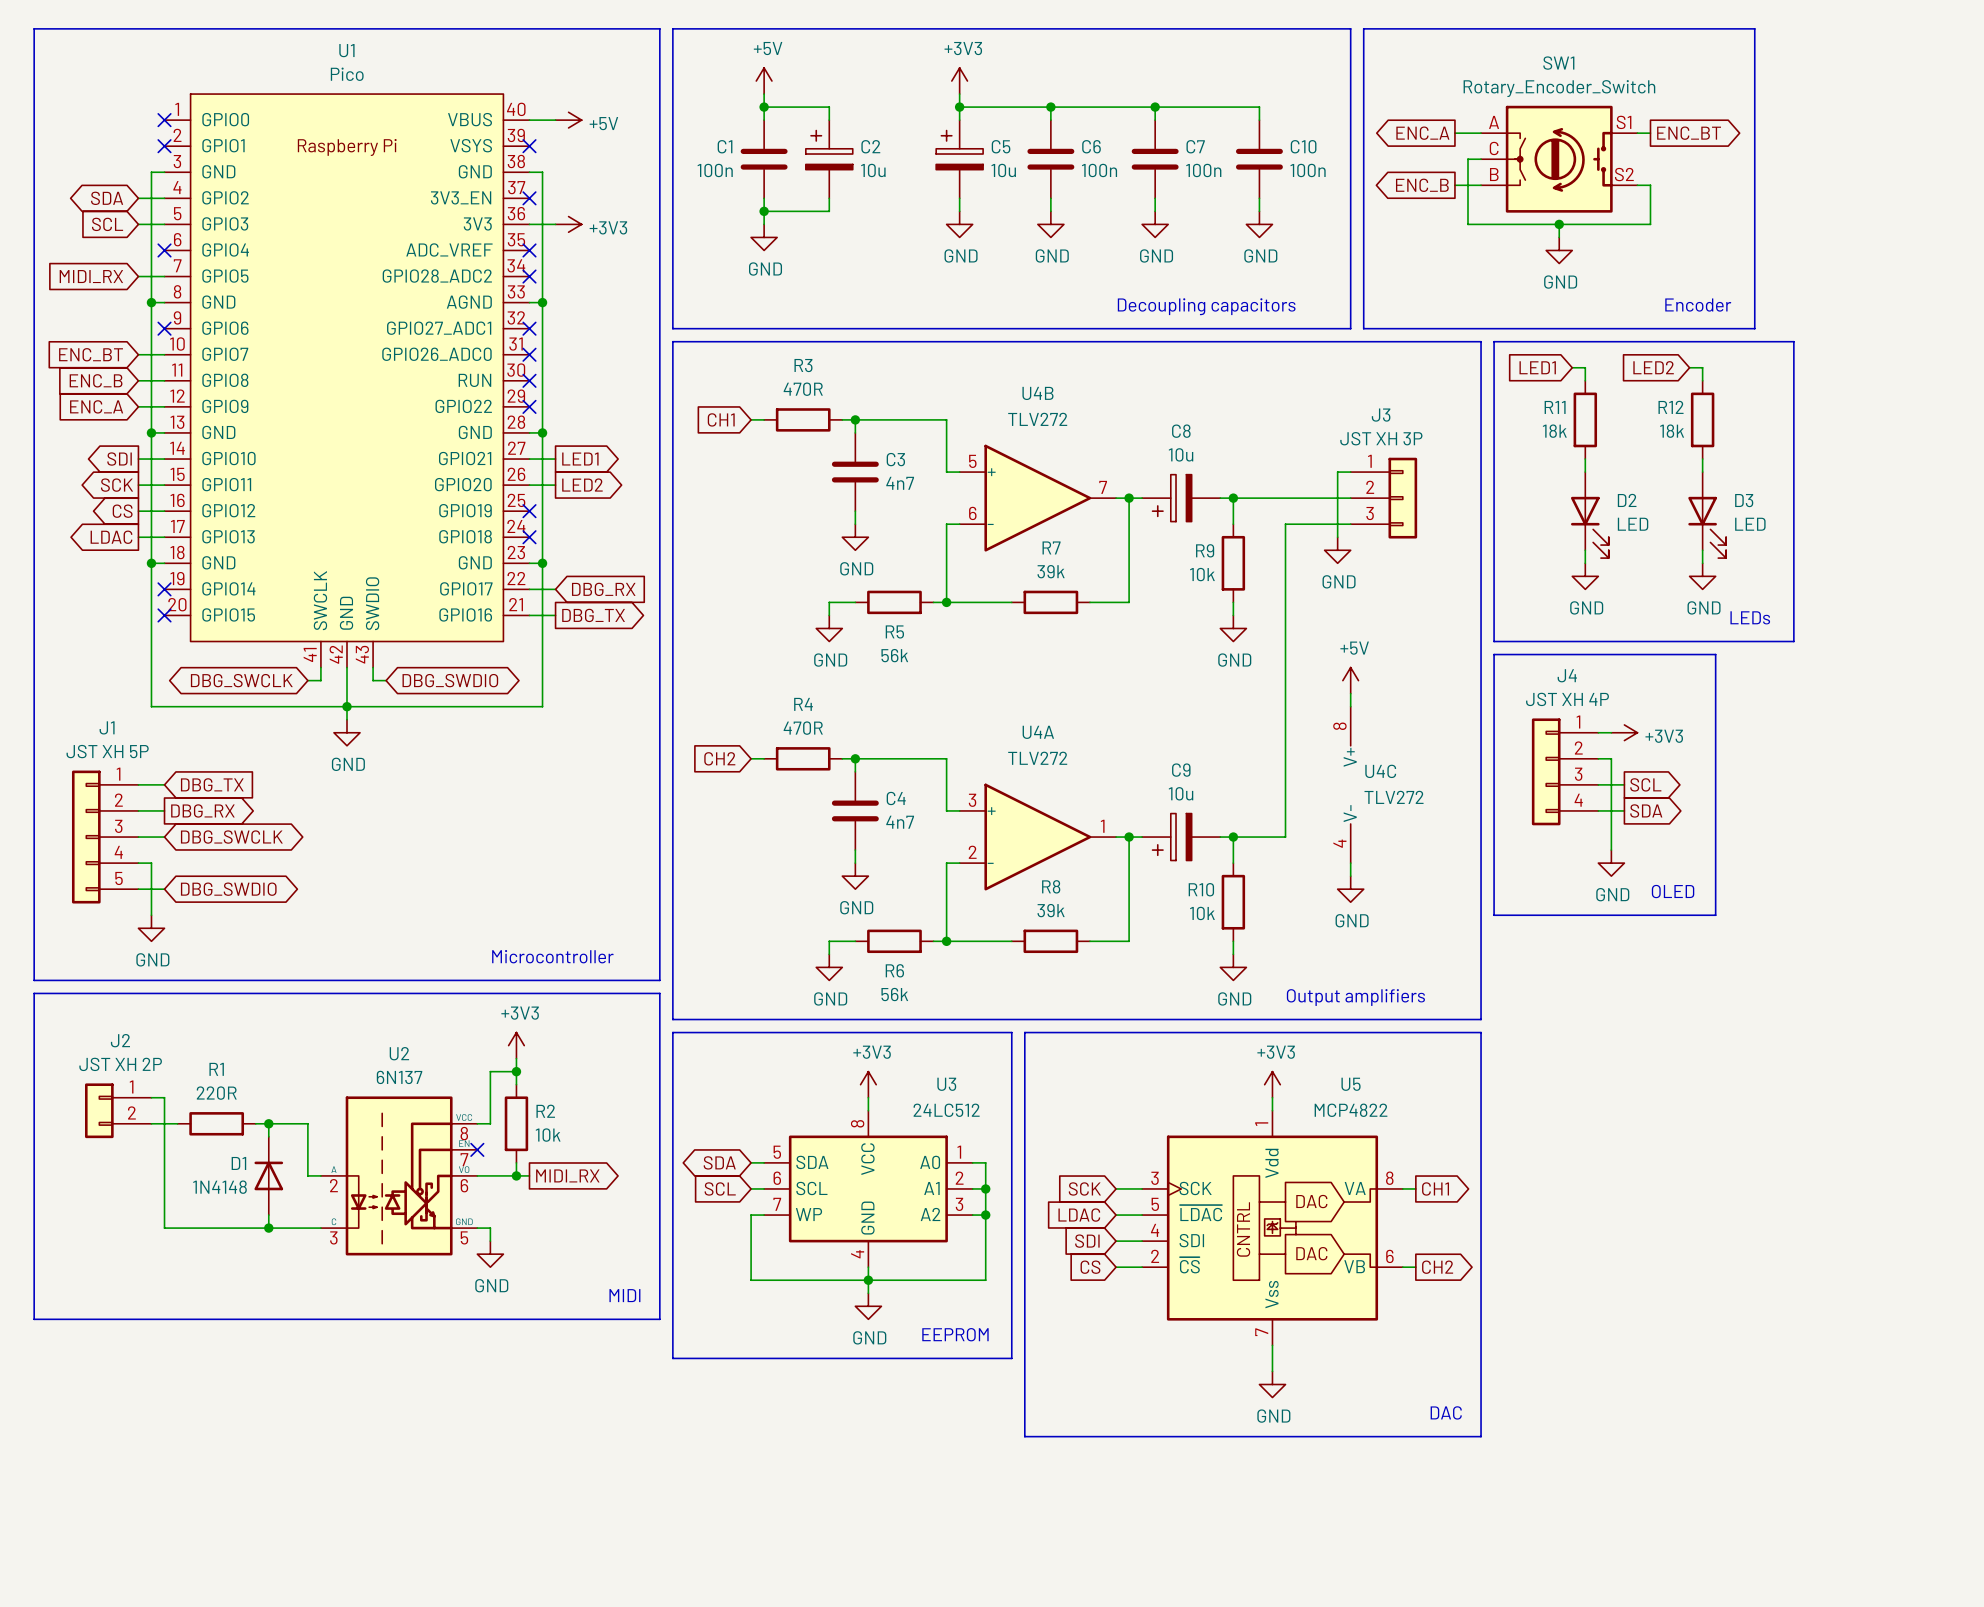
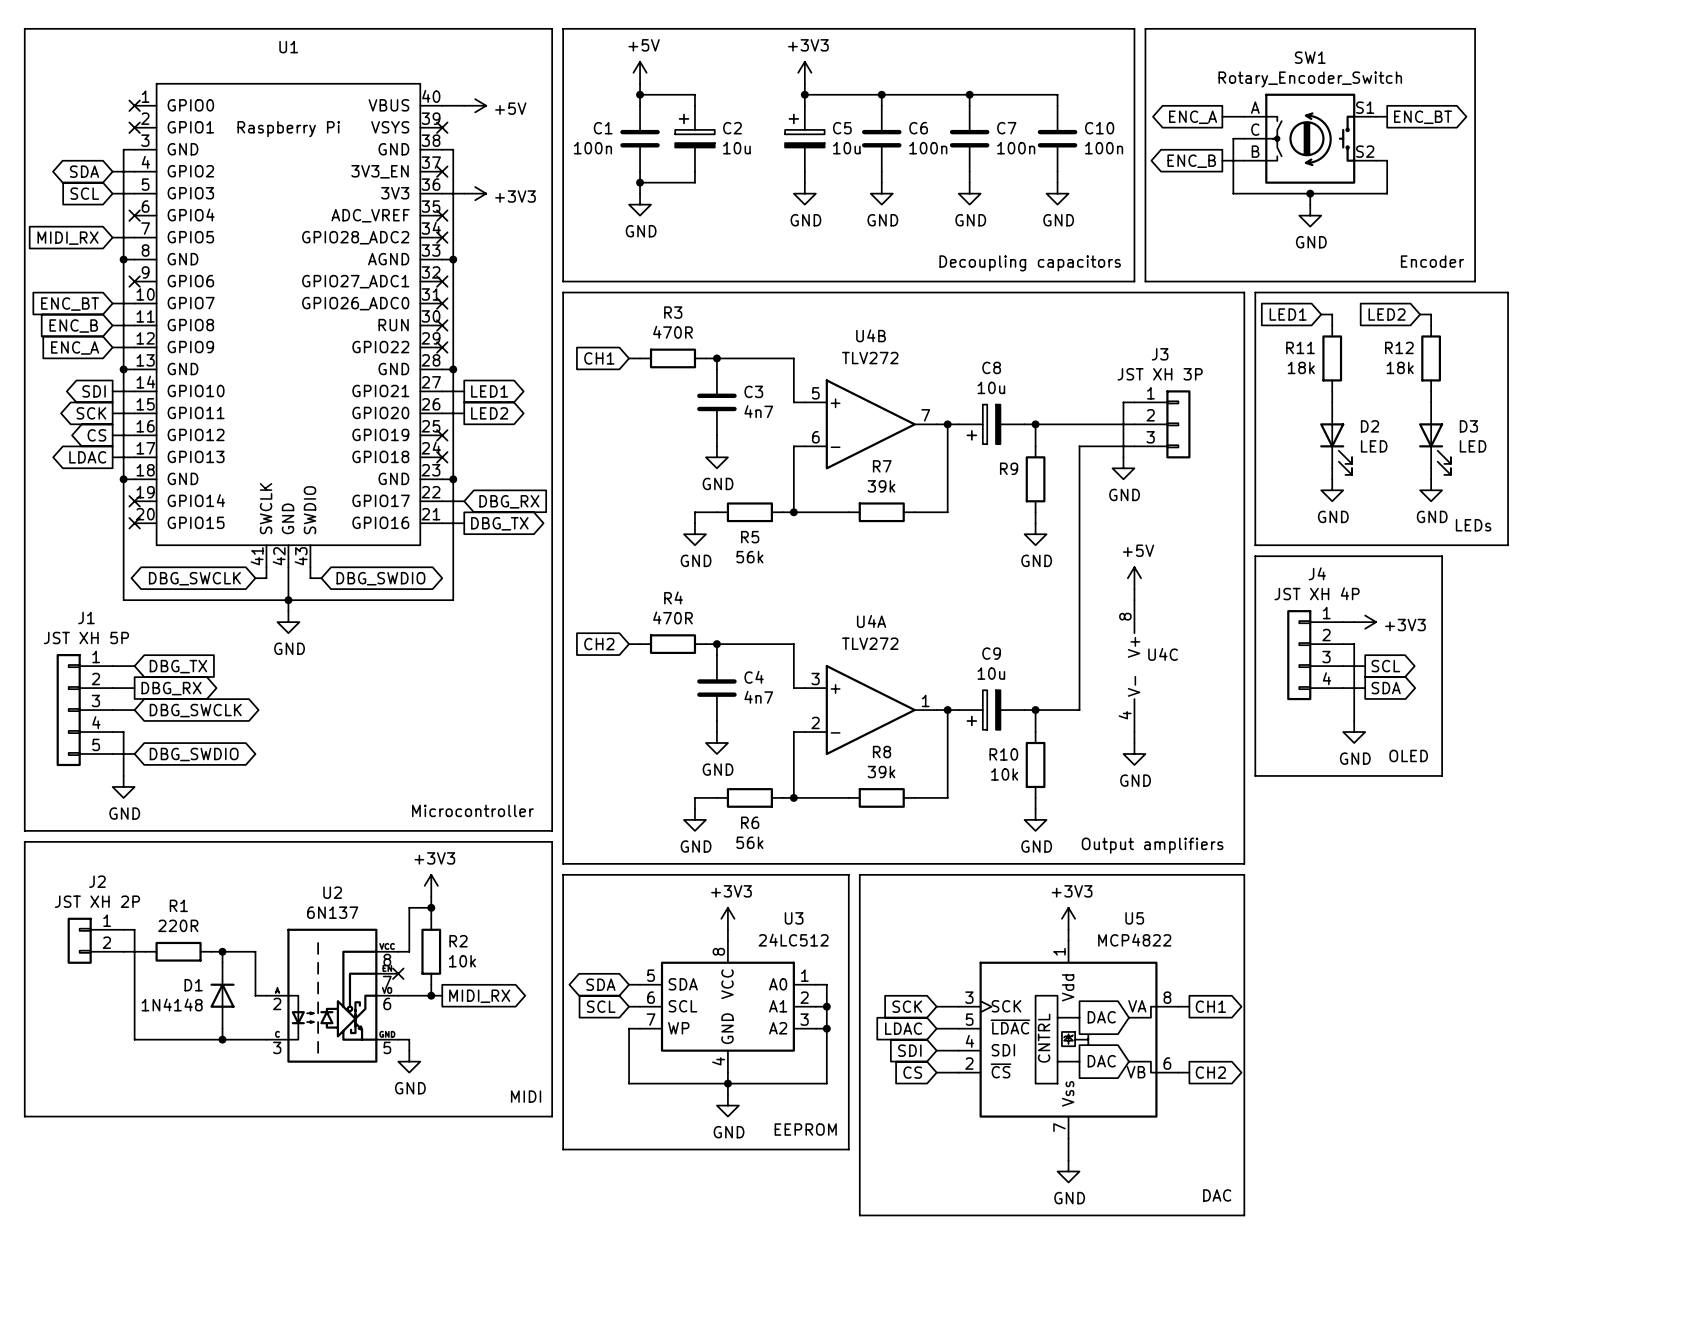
U1 value: Pico (347, 74) -> none
R9 value: 10k (1202, 574) -> none
U4C value: TLV272 (1394, 797) -> none

